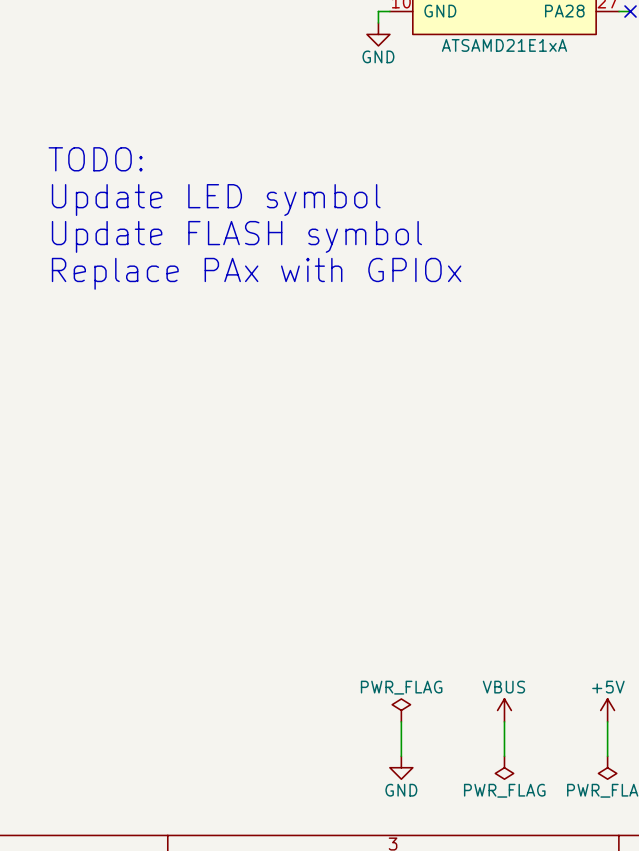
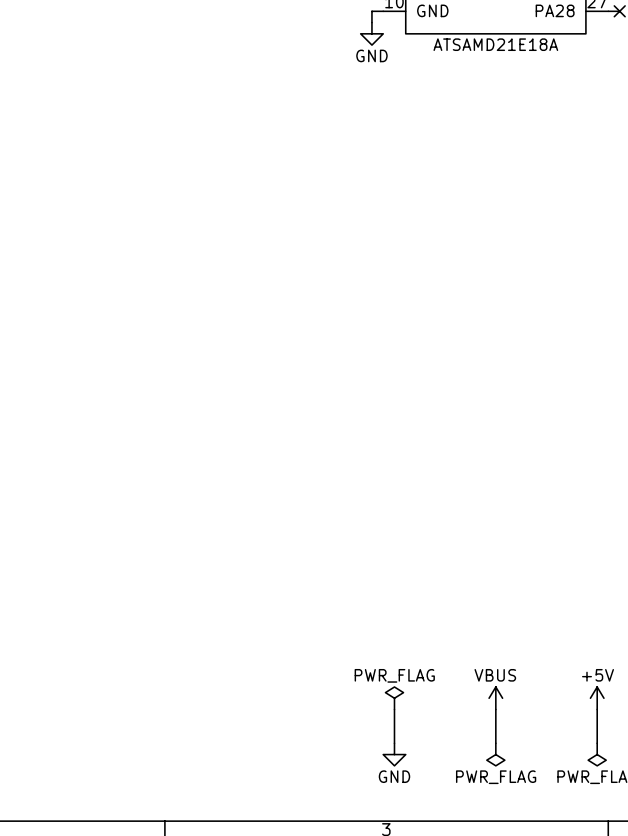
part value: ATSAMD21E1xA (504, 45) -> ATSAMD21E18A (495, 44)
text: TODO: (95, 159) -> none
text: Update LED symbol (216, 200) -> none
text: Update FLASH symbol (236, 236) -> none
text: Replace PAx with GPIOx (256, 273) -> none

